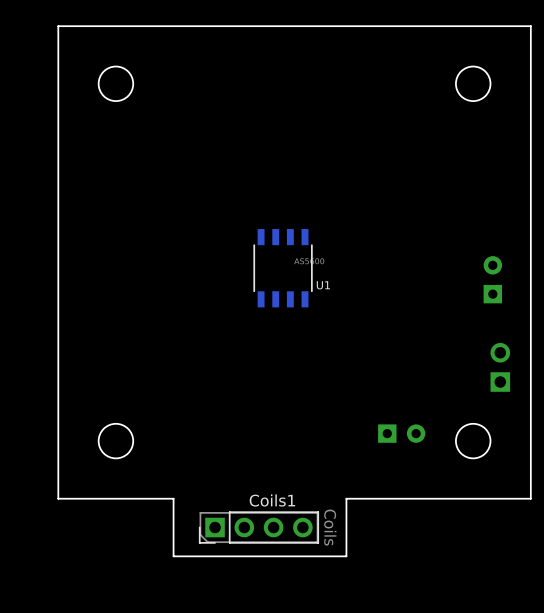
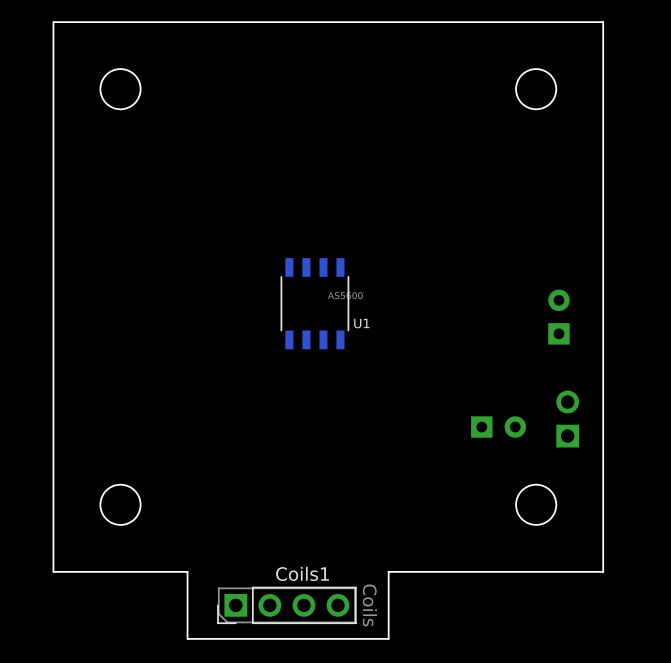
part position: (401, 433) -> (498, 427)

